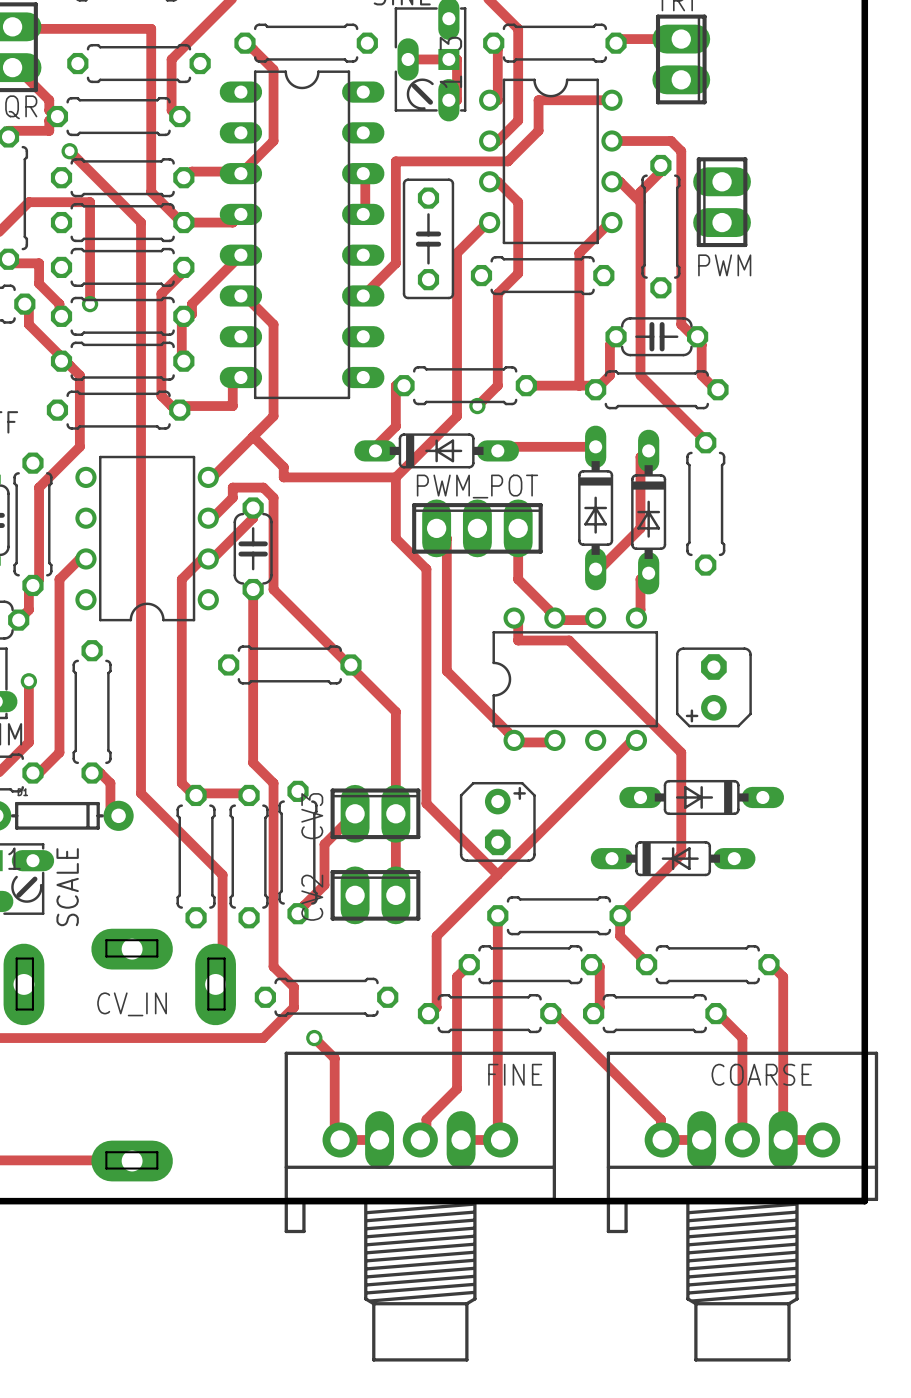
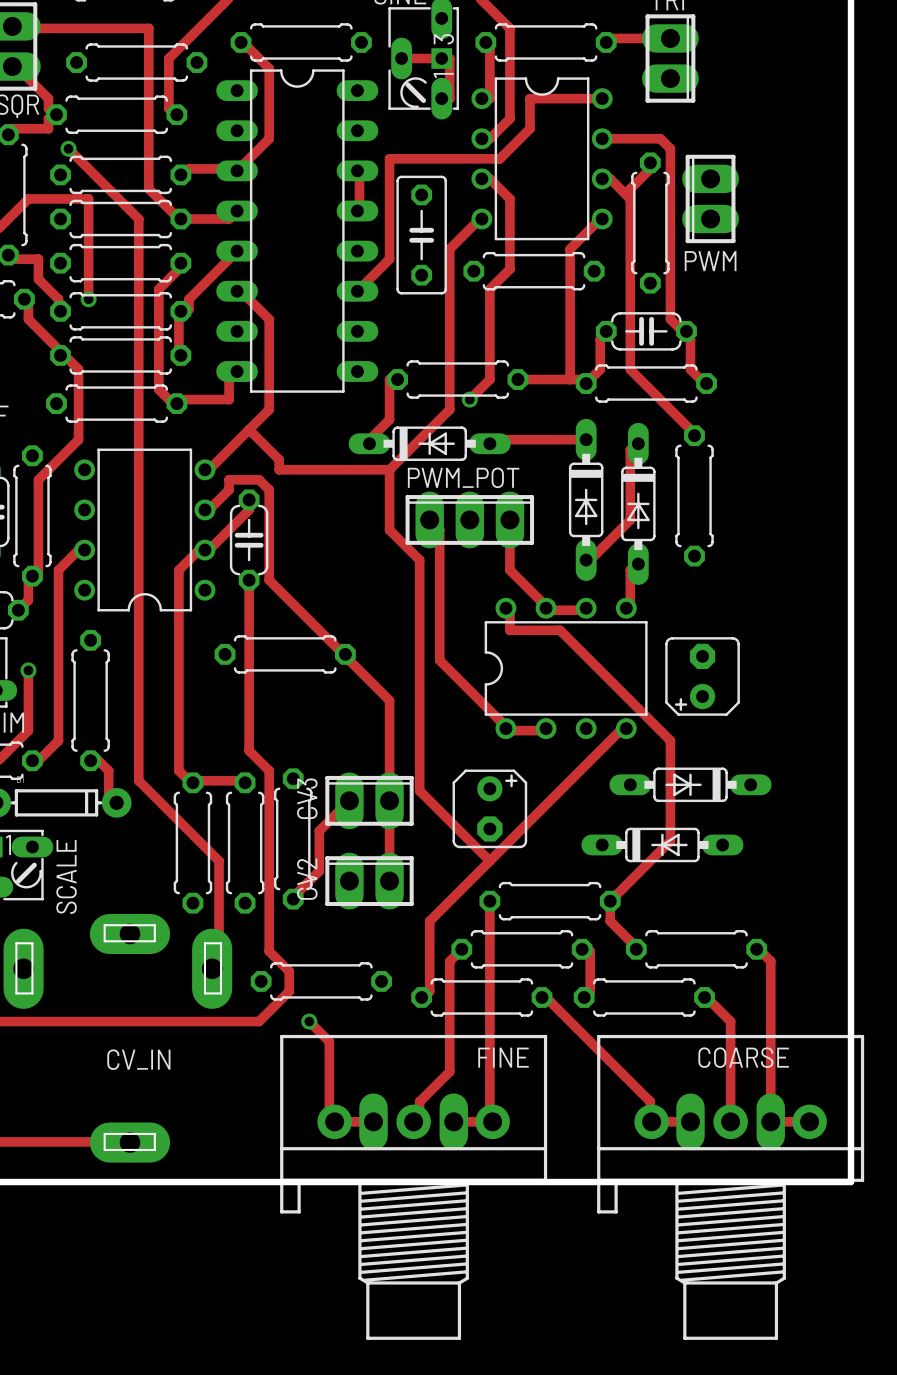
CV_IN name position: CV_IN (132, 1004) -> CV_IN (138, 1059)

